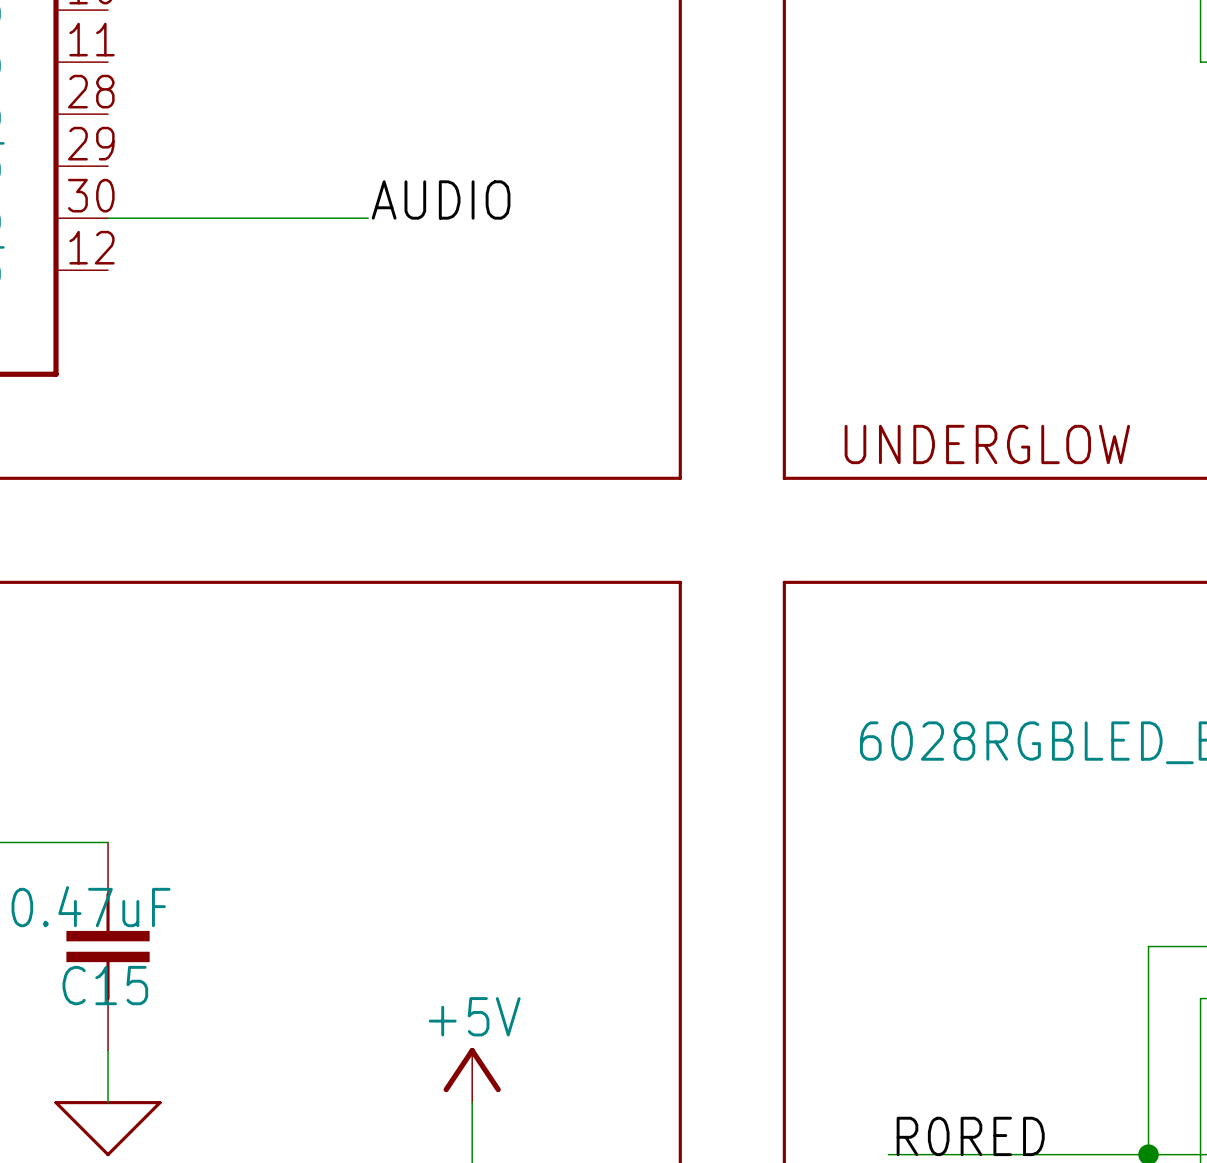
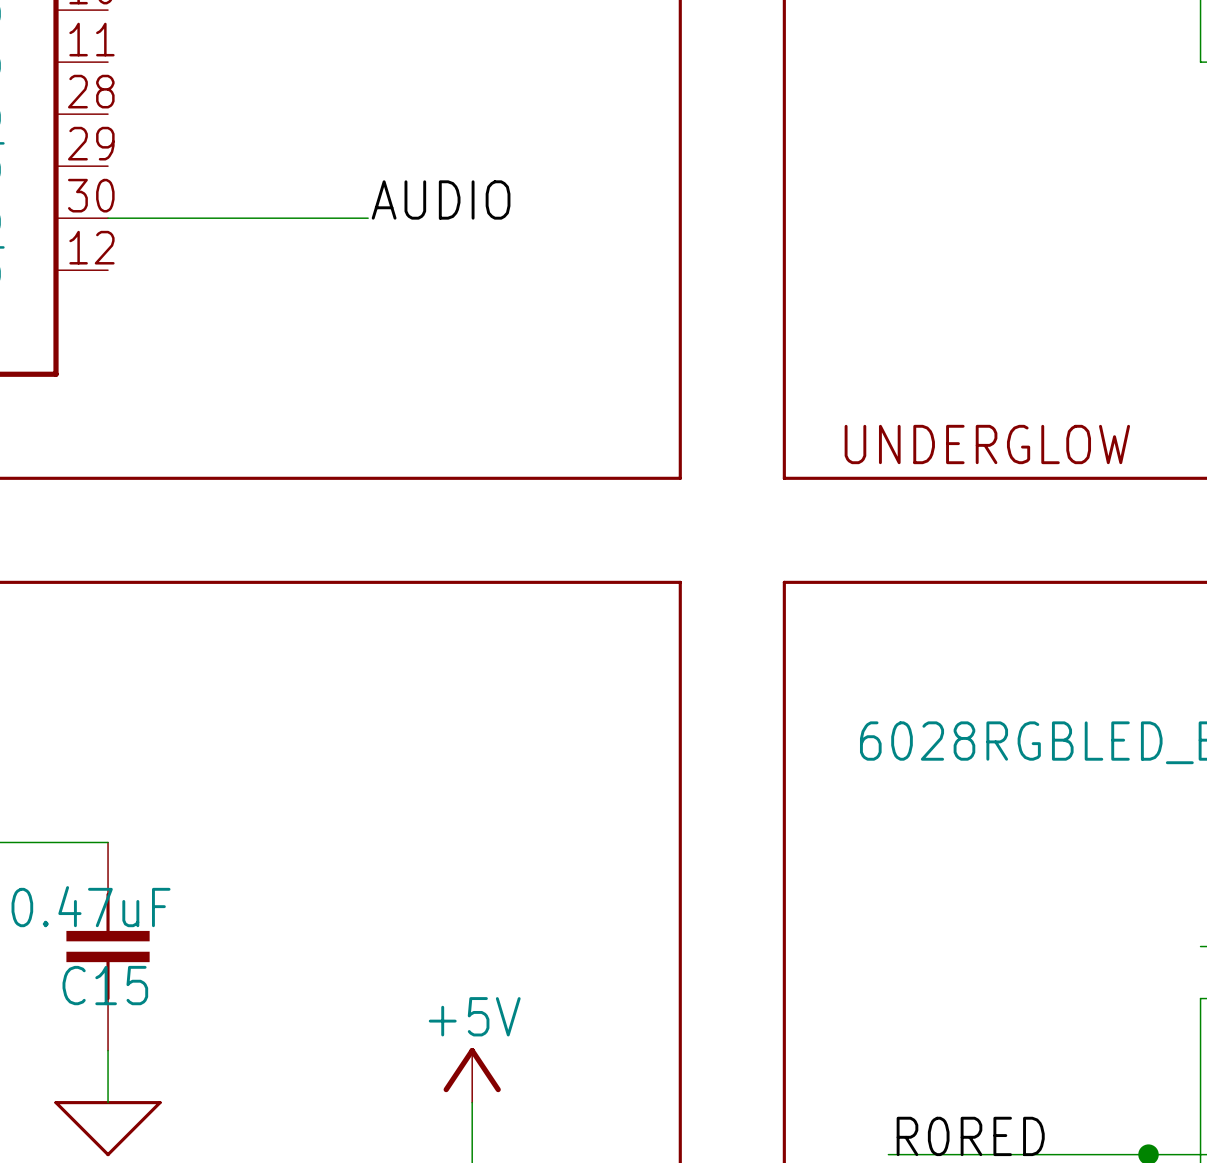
wire: (1200, 946) (1148, 946) (1148, 1154) -> none

